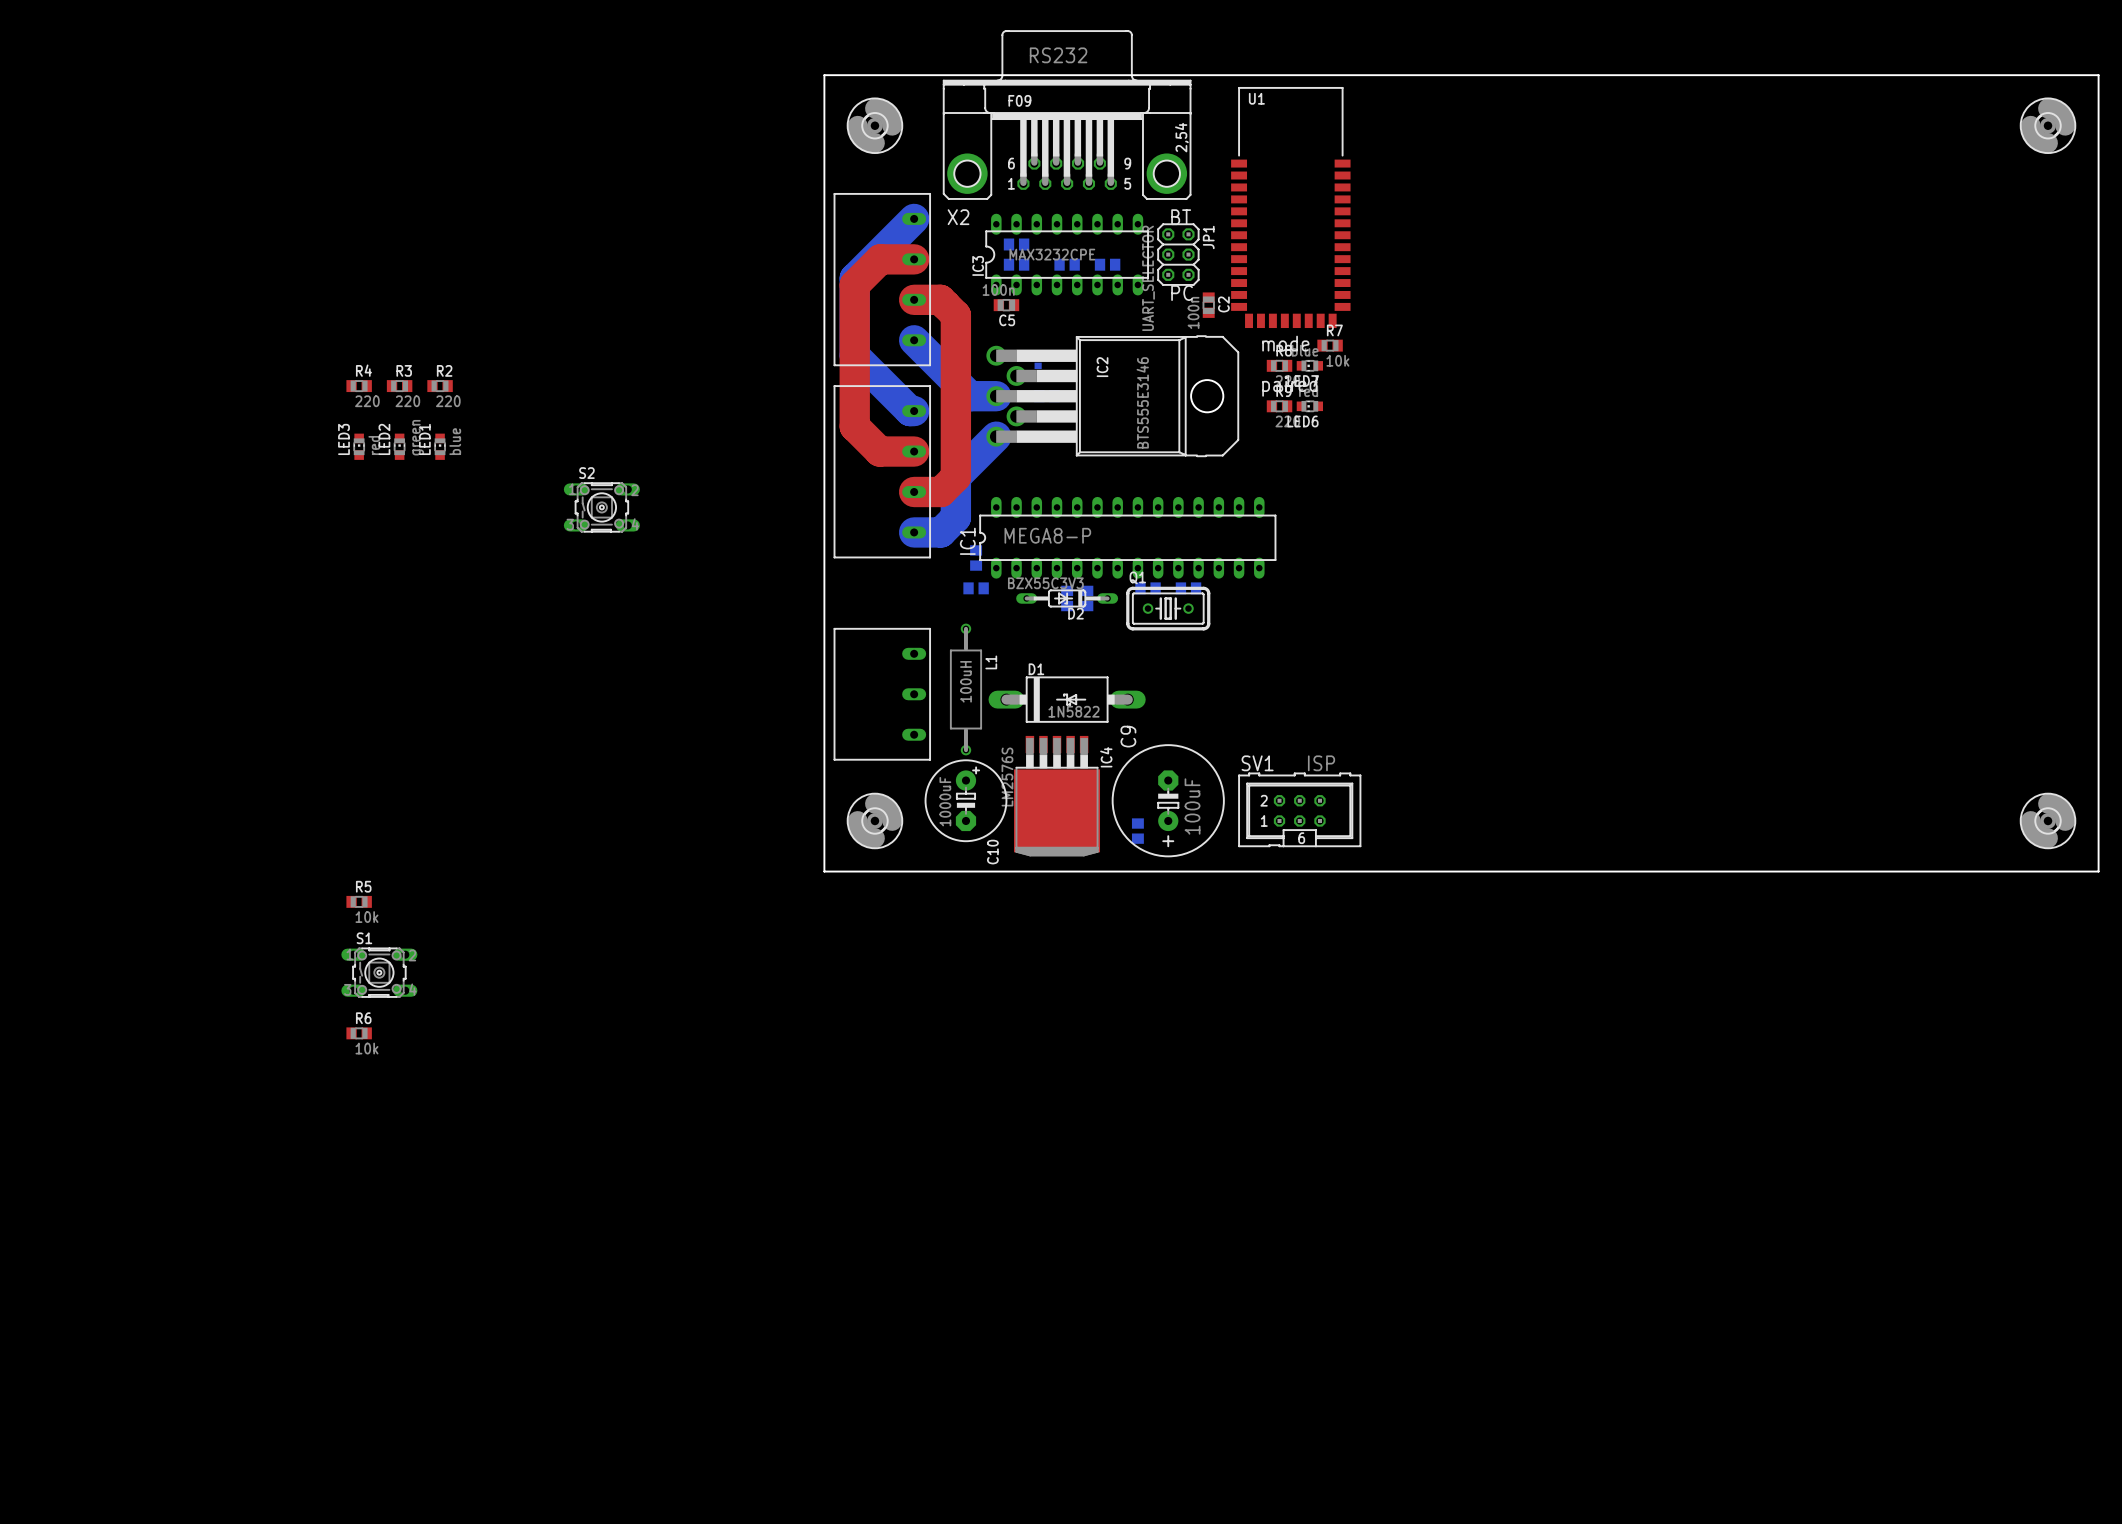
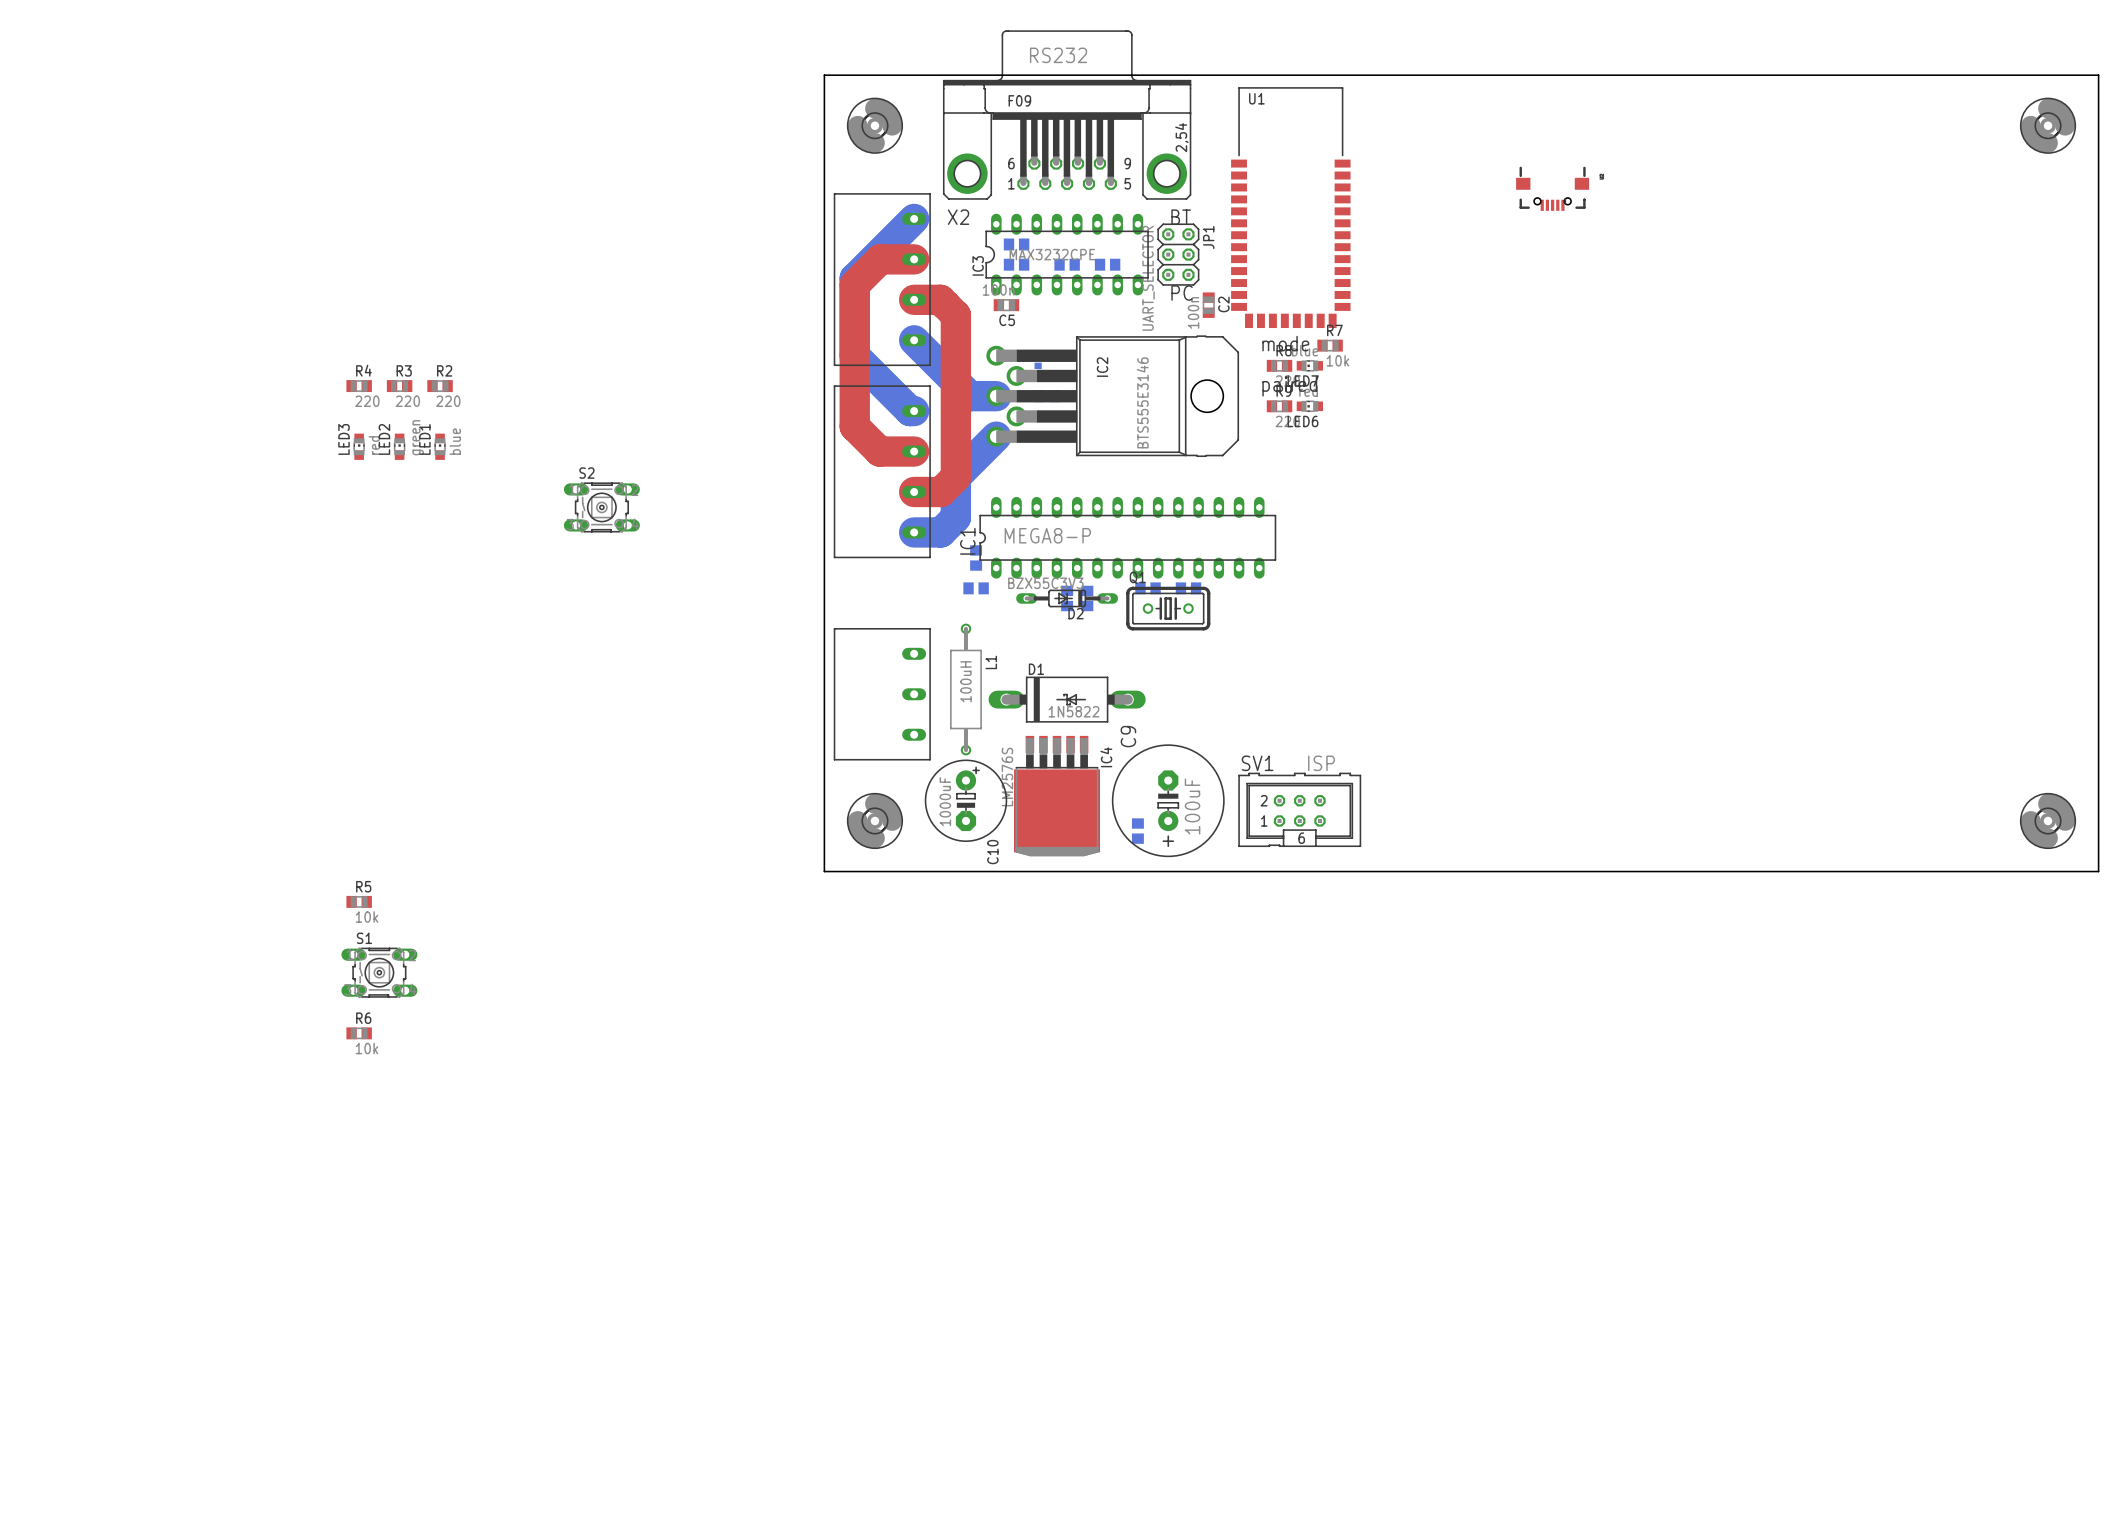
part: none -> (1552, 188)

